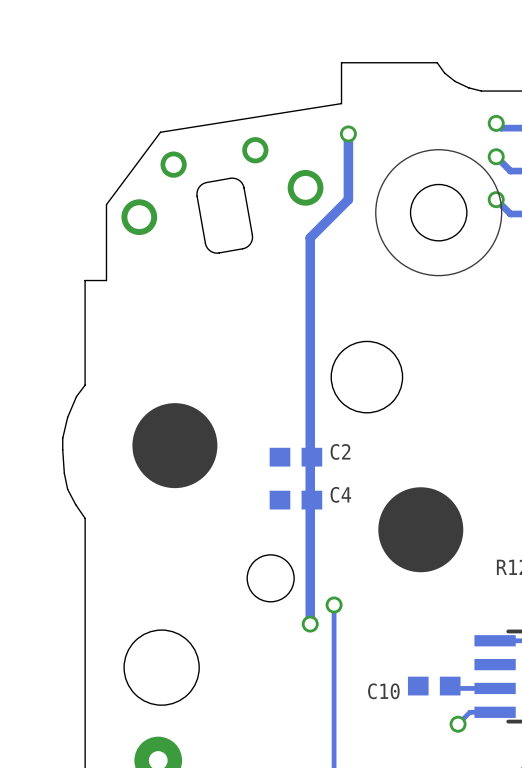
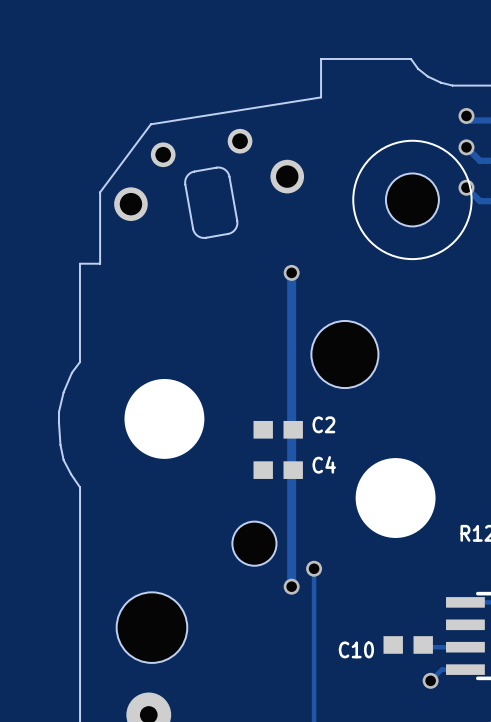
track: (348, 133) (348, 199) (310, 237) (310, 290) -> none
via: (348, 133) -> none
via: none -> (291, 272)

